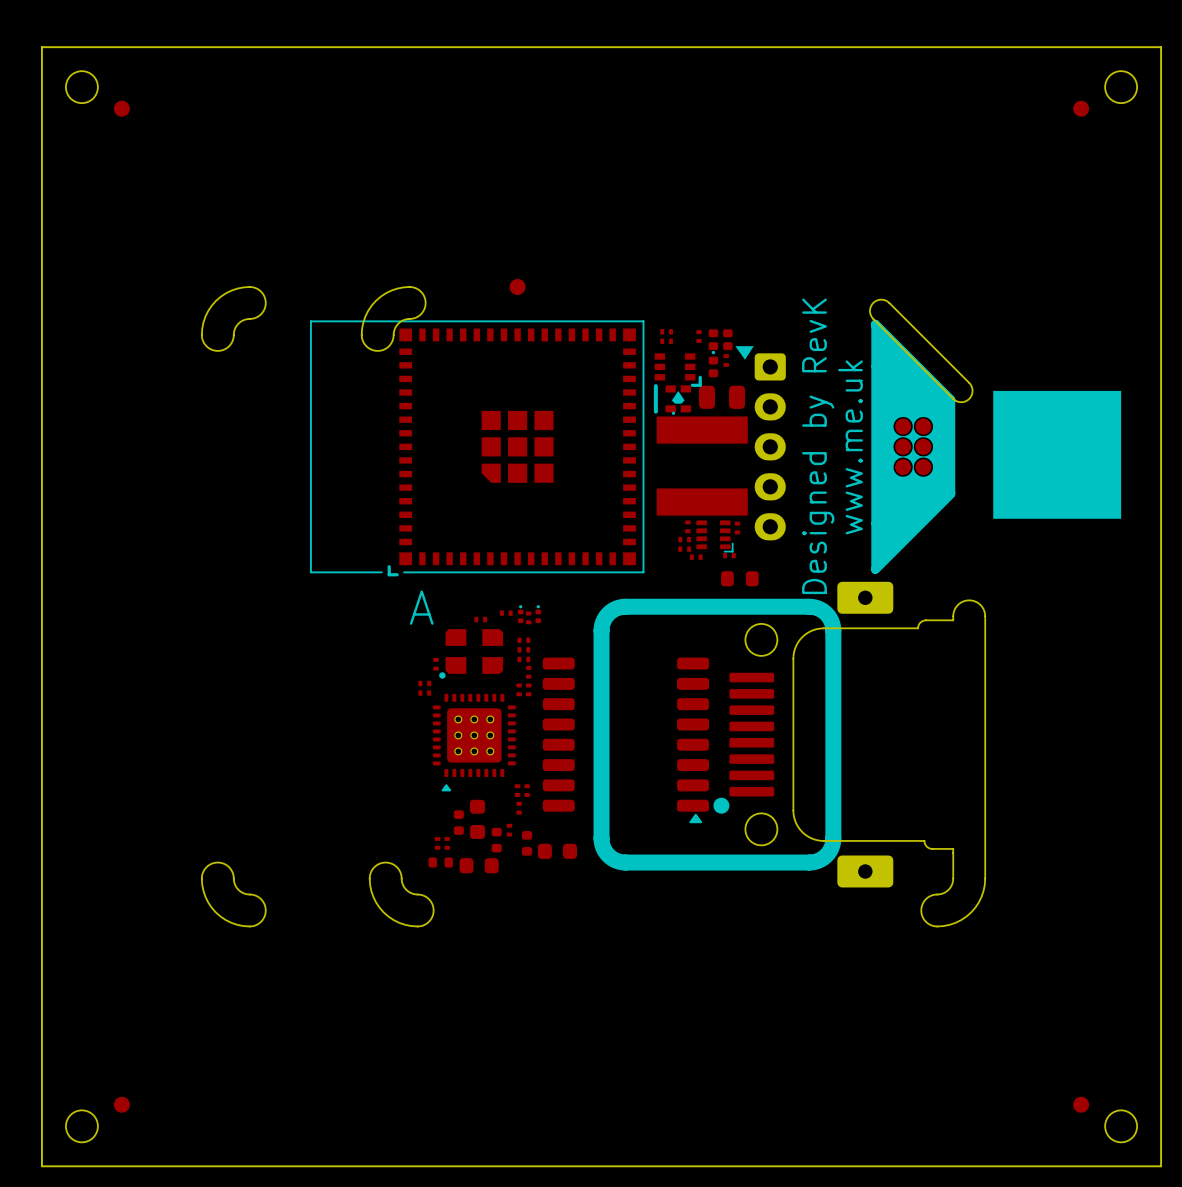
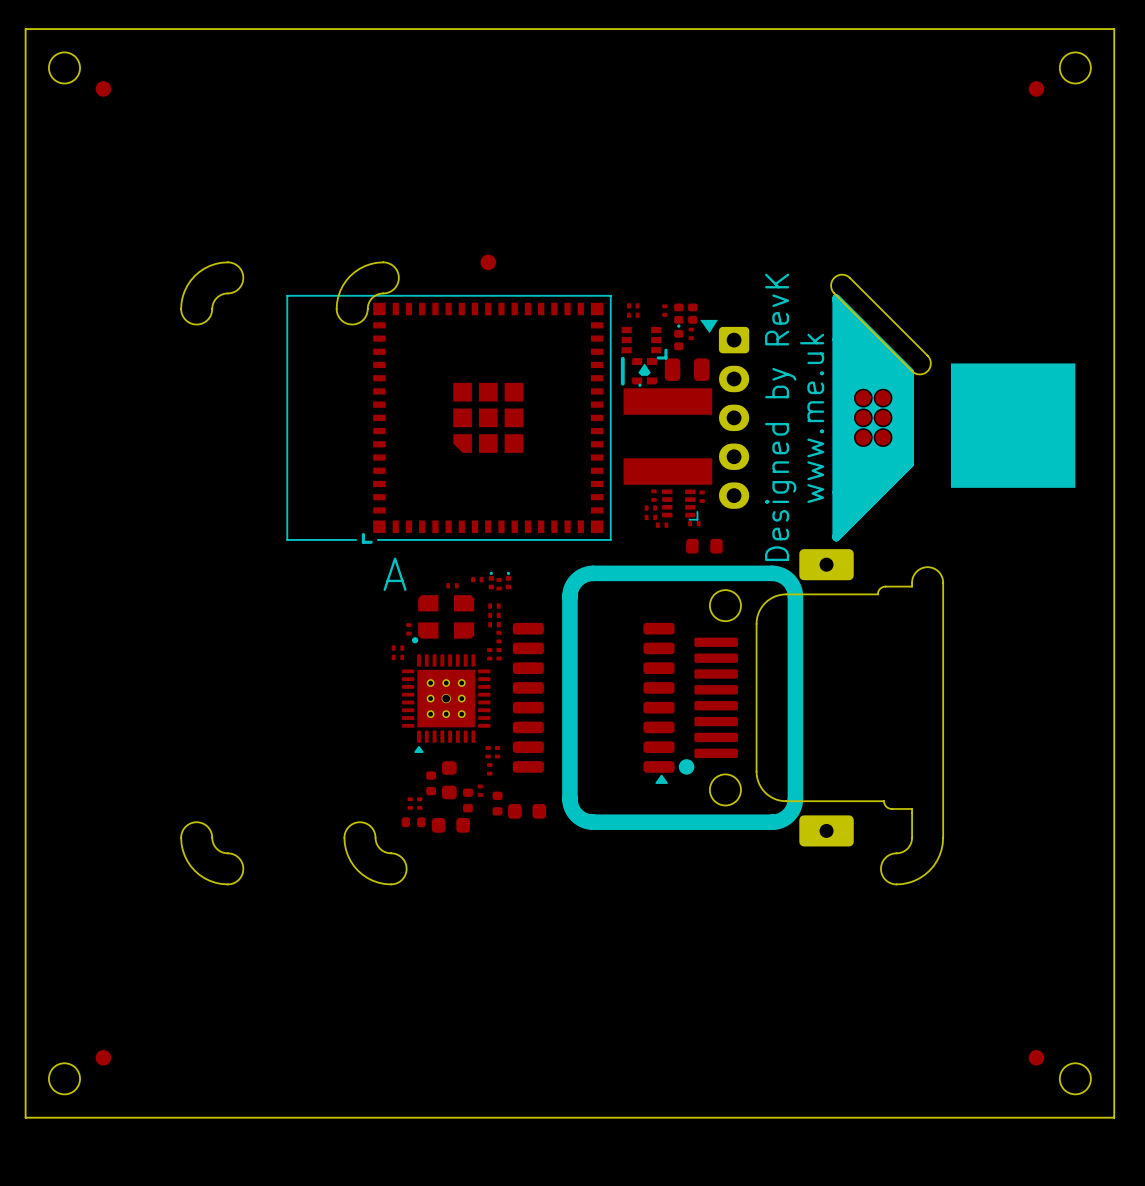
part footprint: [432, 693, 516, 792] -> [401, 654, 491, 754]

